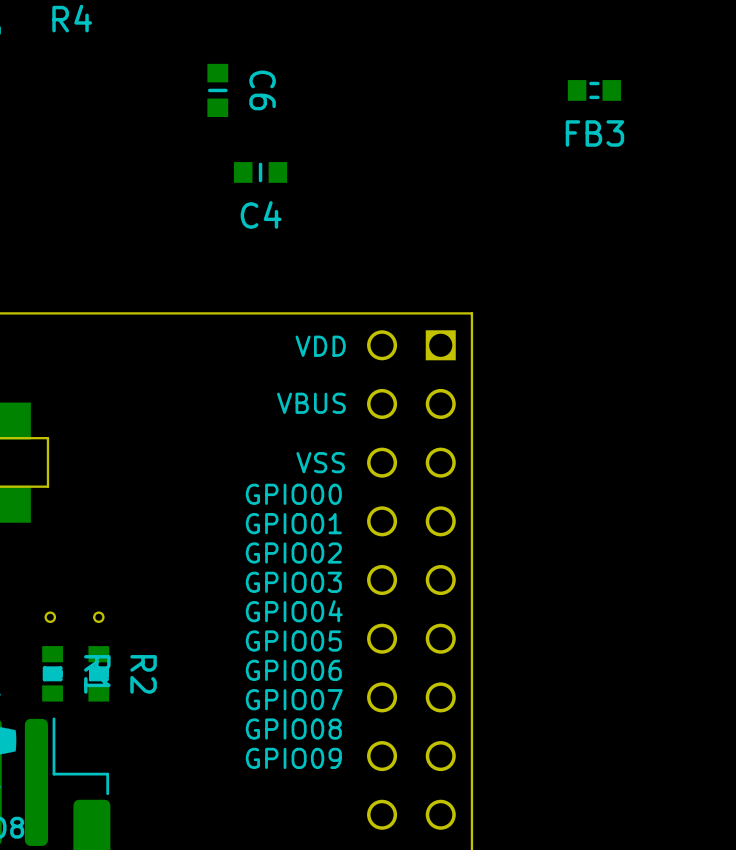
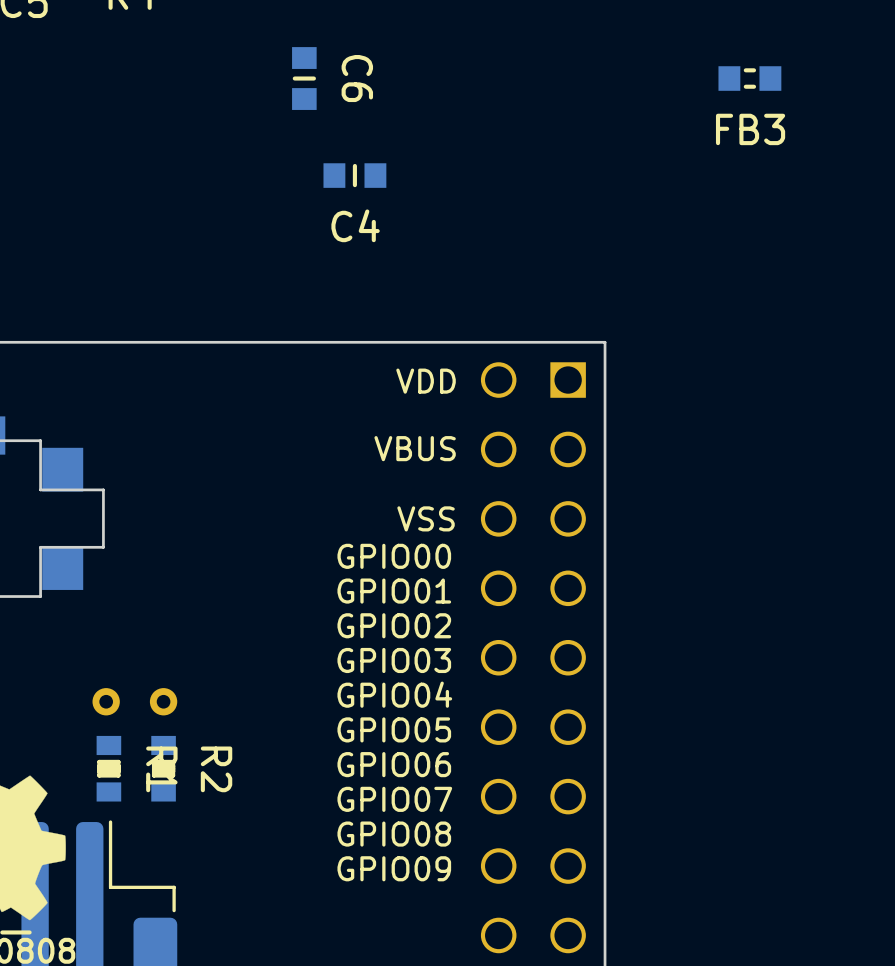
part footprint: [44, 611, 57, 624] -> [92, 688, 120, 716]
part footprint: [93, 611, 105, 624] -> [149, 688, 178, 716]

